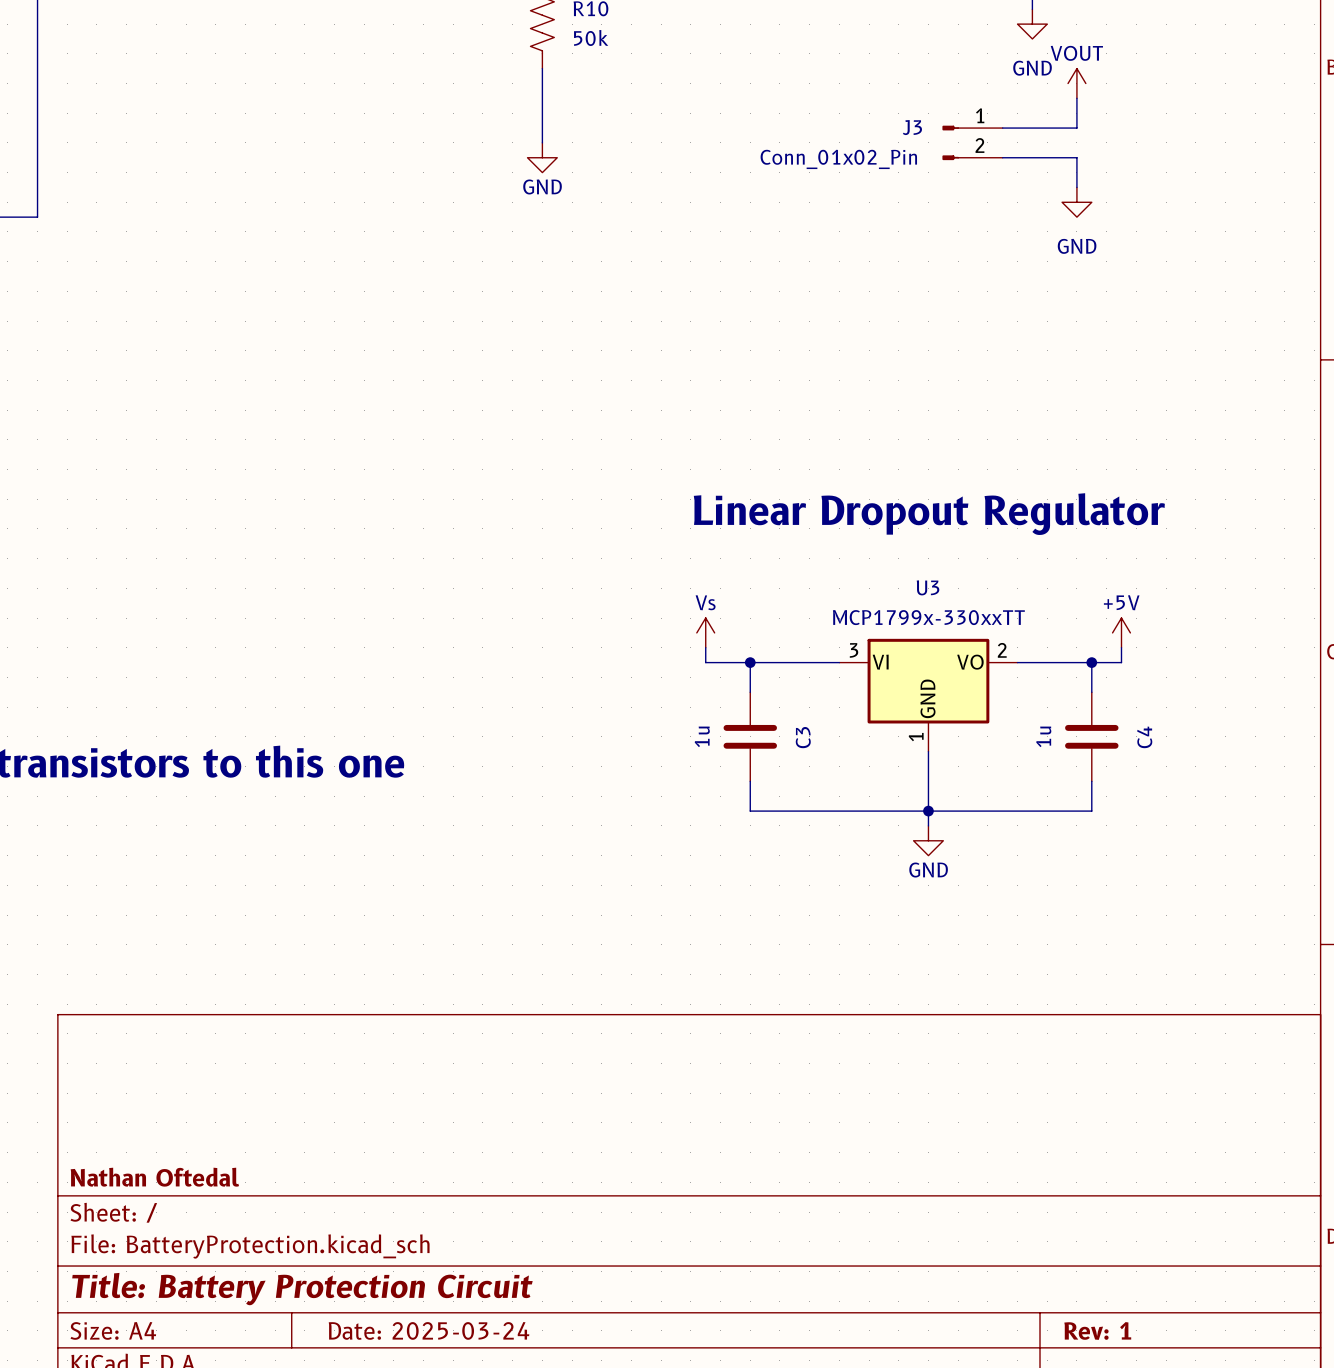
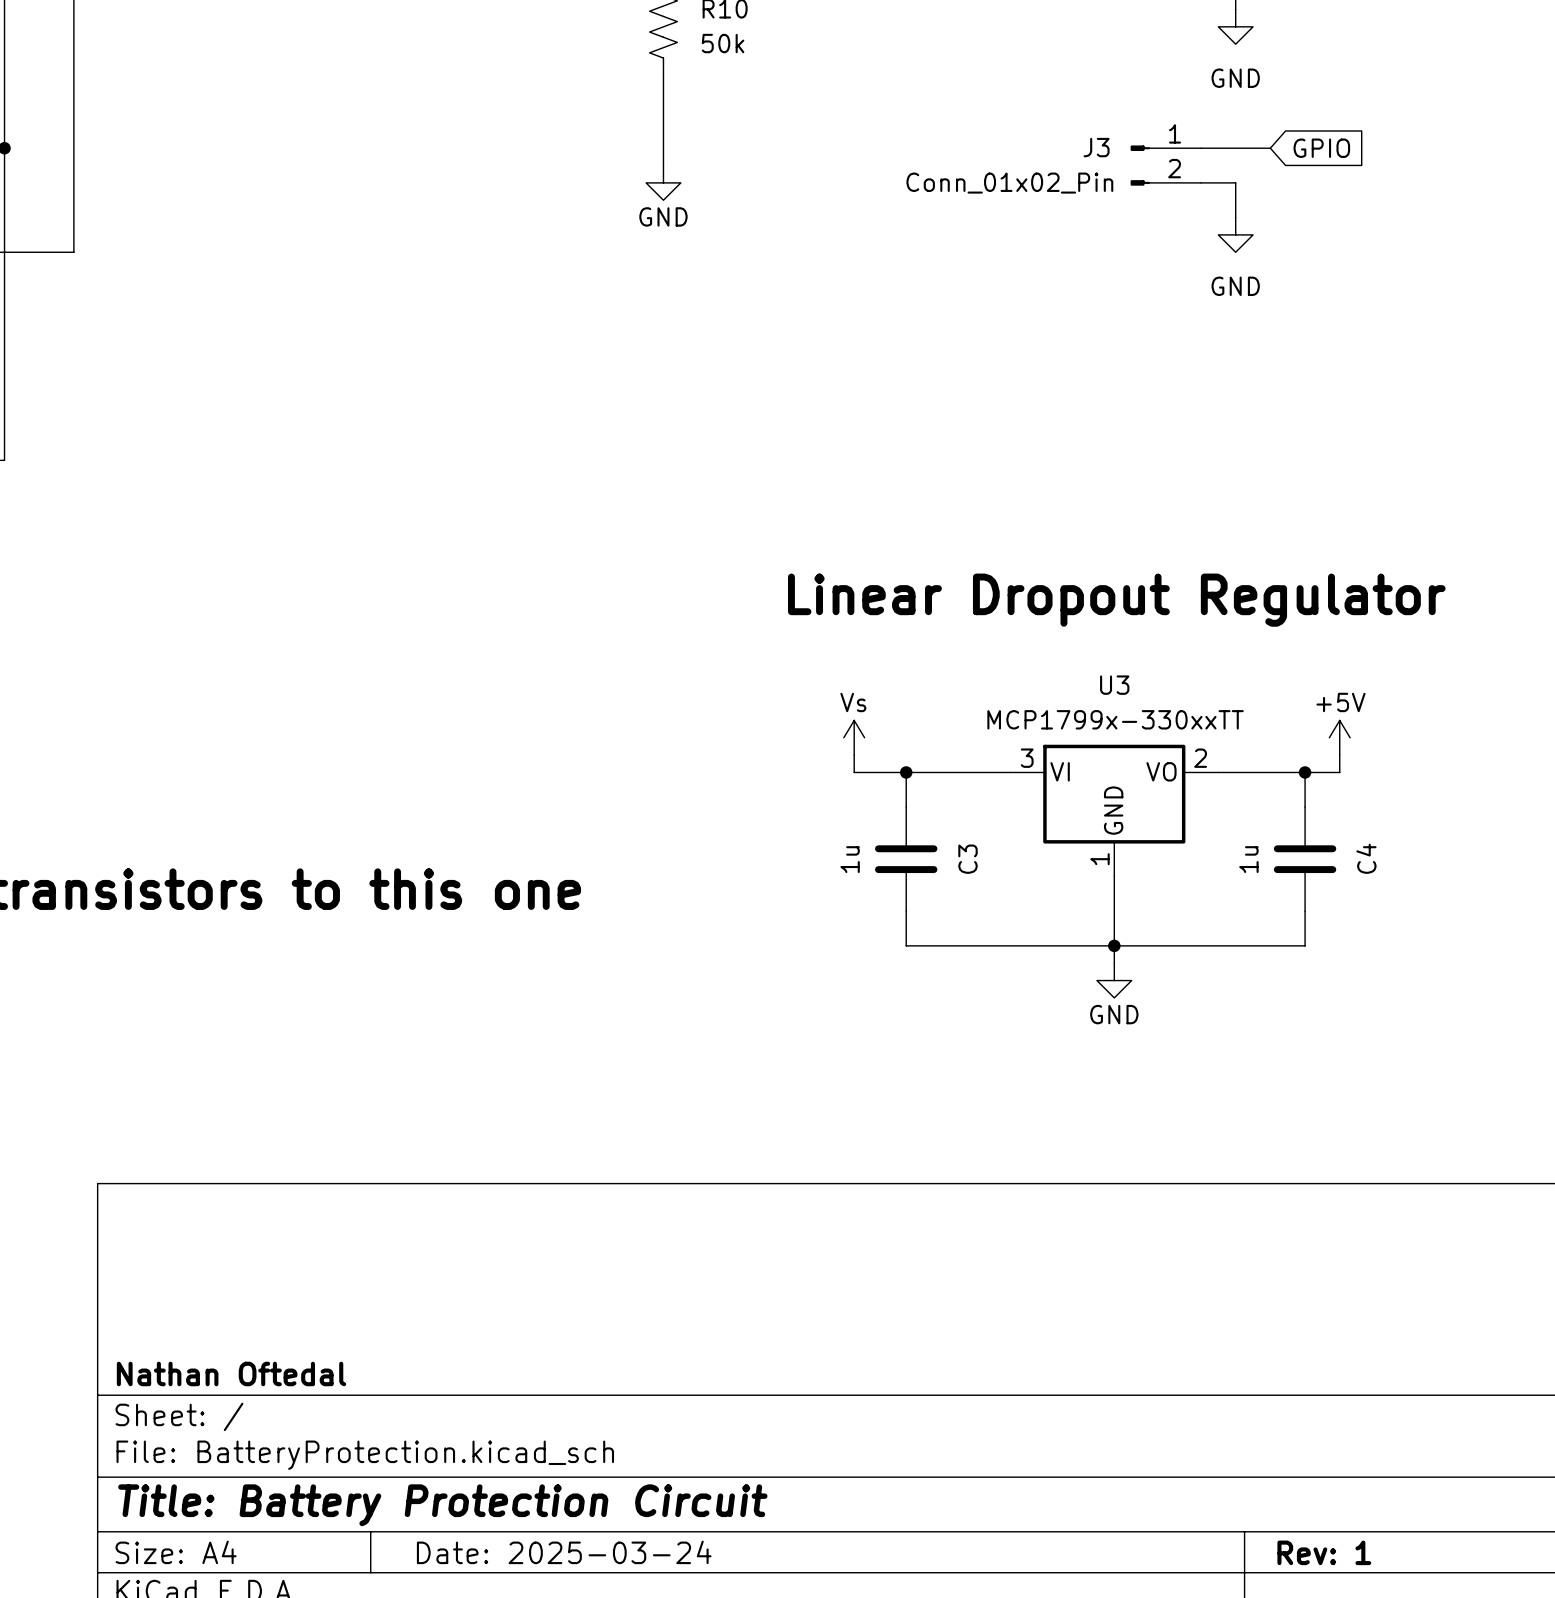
power symbol: VOUT (1076, 83) -> none
wire: (1076, 98) (1076, 128) (1062, 128) -> none
global label: none -> GPIO (1321, 148)
wire: (1032, 157) (1076, 157) (1076, 187) -> (1235, 182) (1235, 217)
power symbol position: GND (1076, 202) -> GND (1235, 234)

